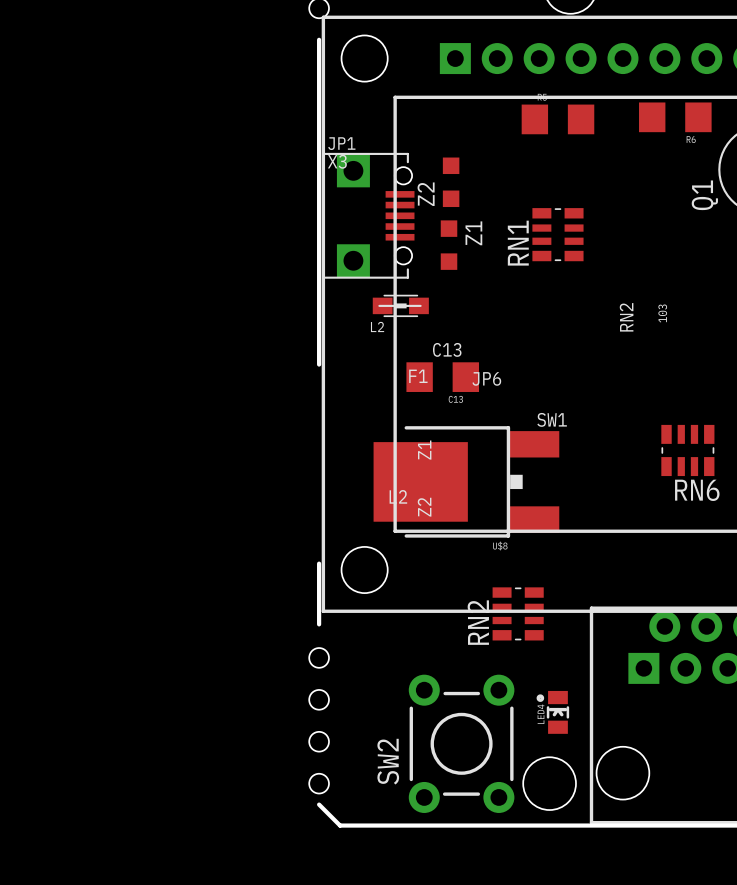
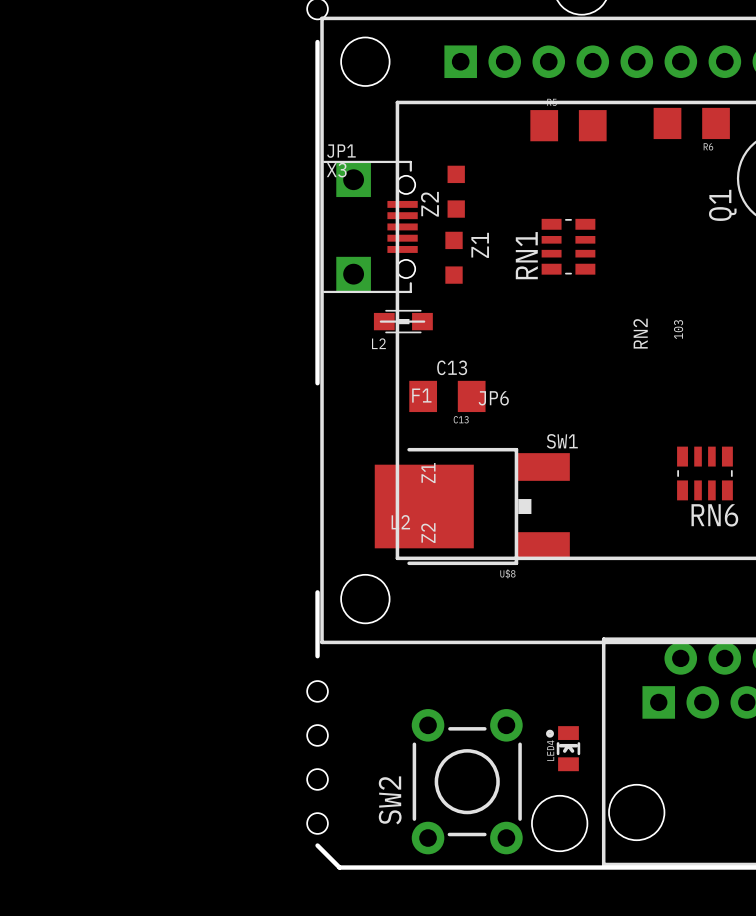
RN2: (518, 613) -> none

